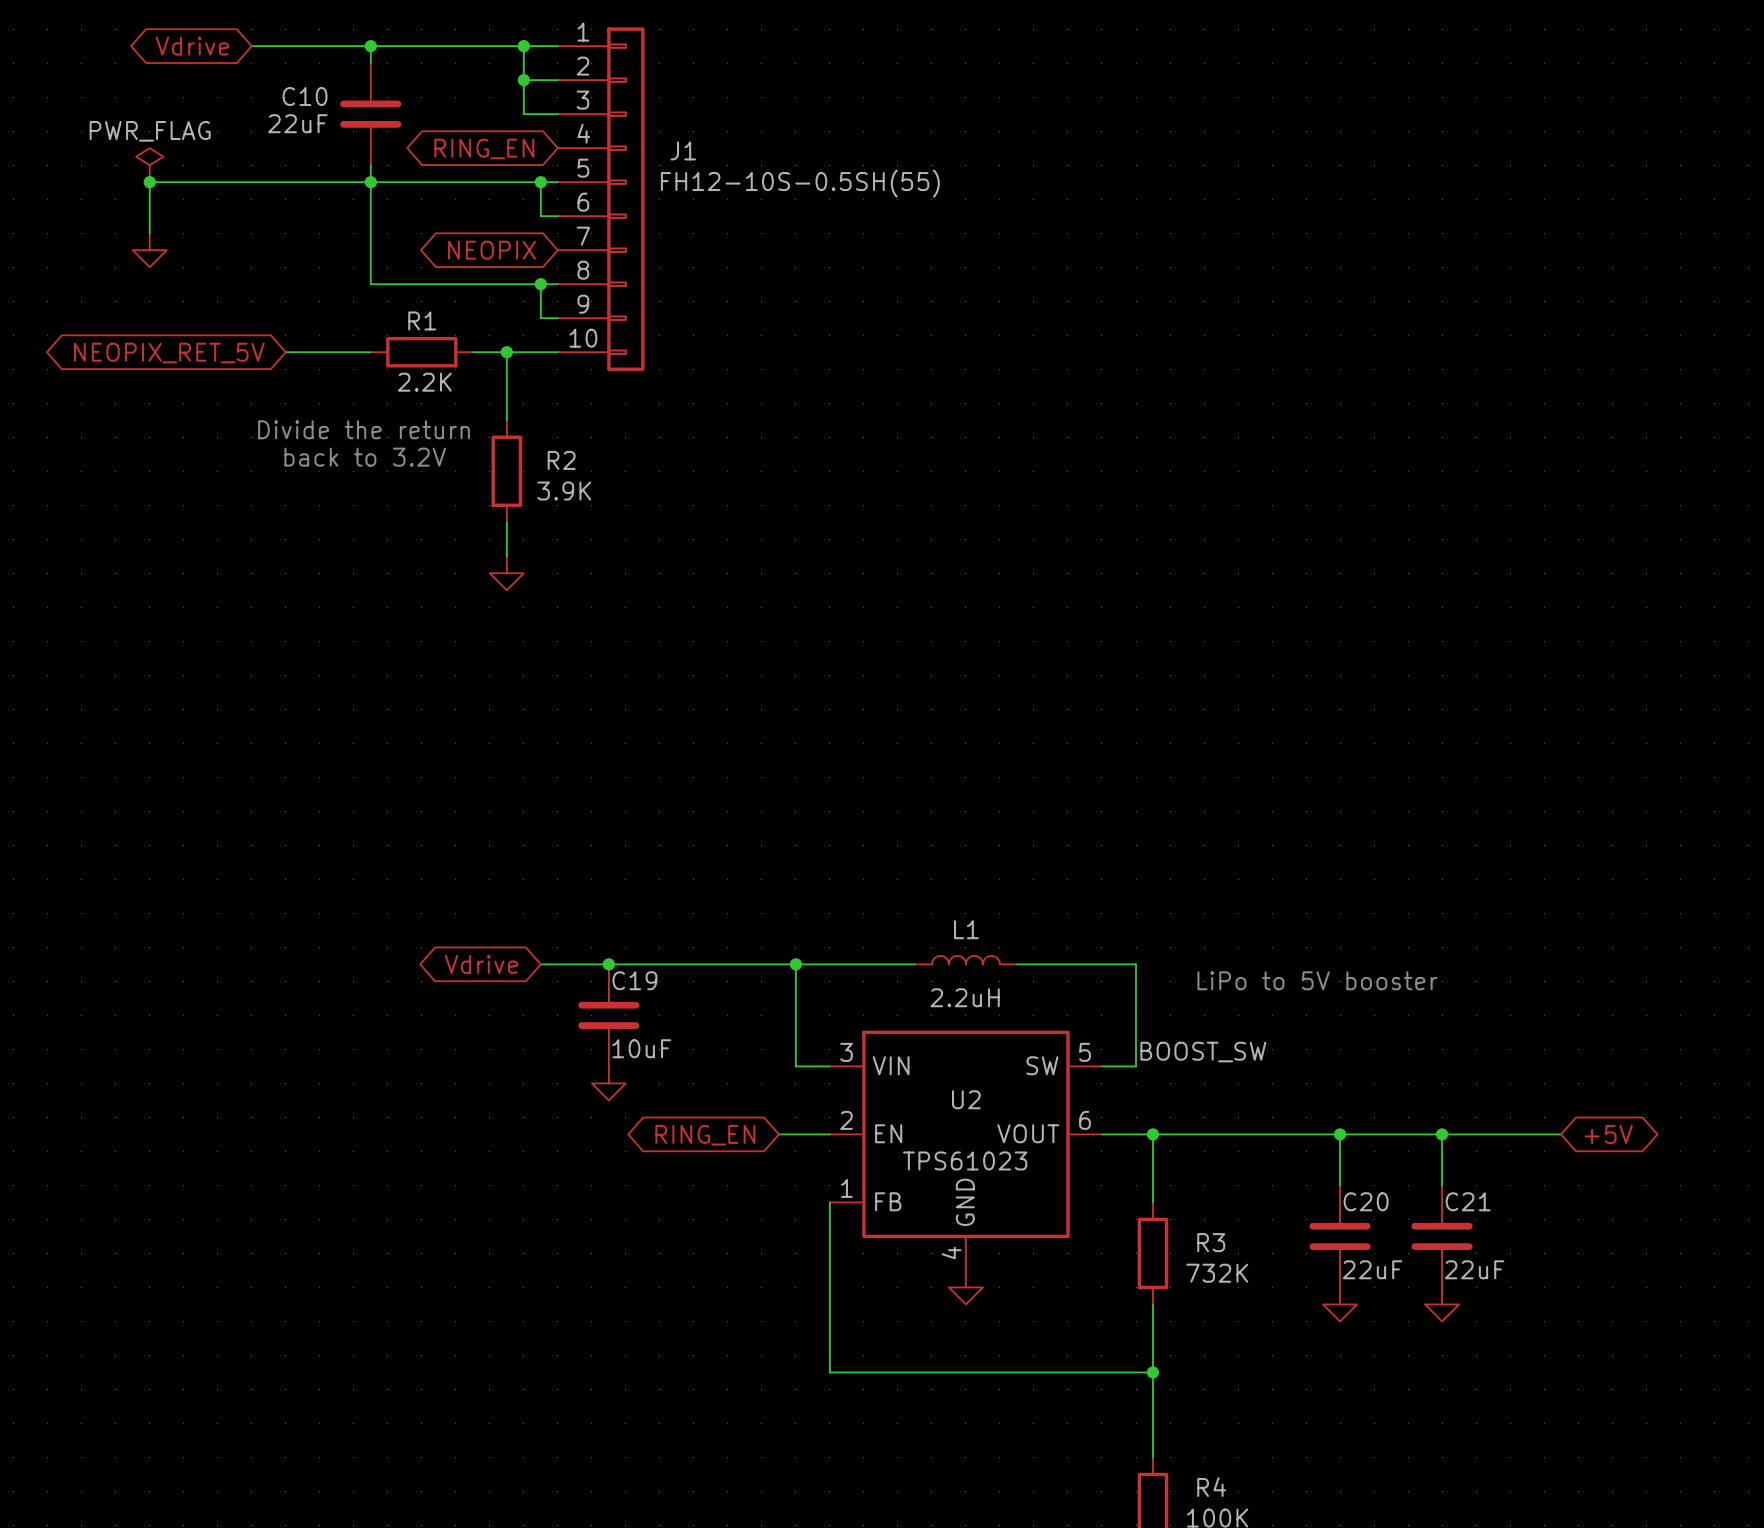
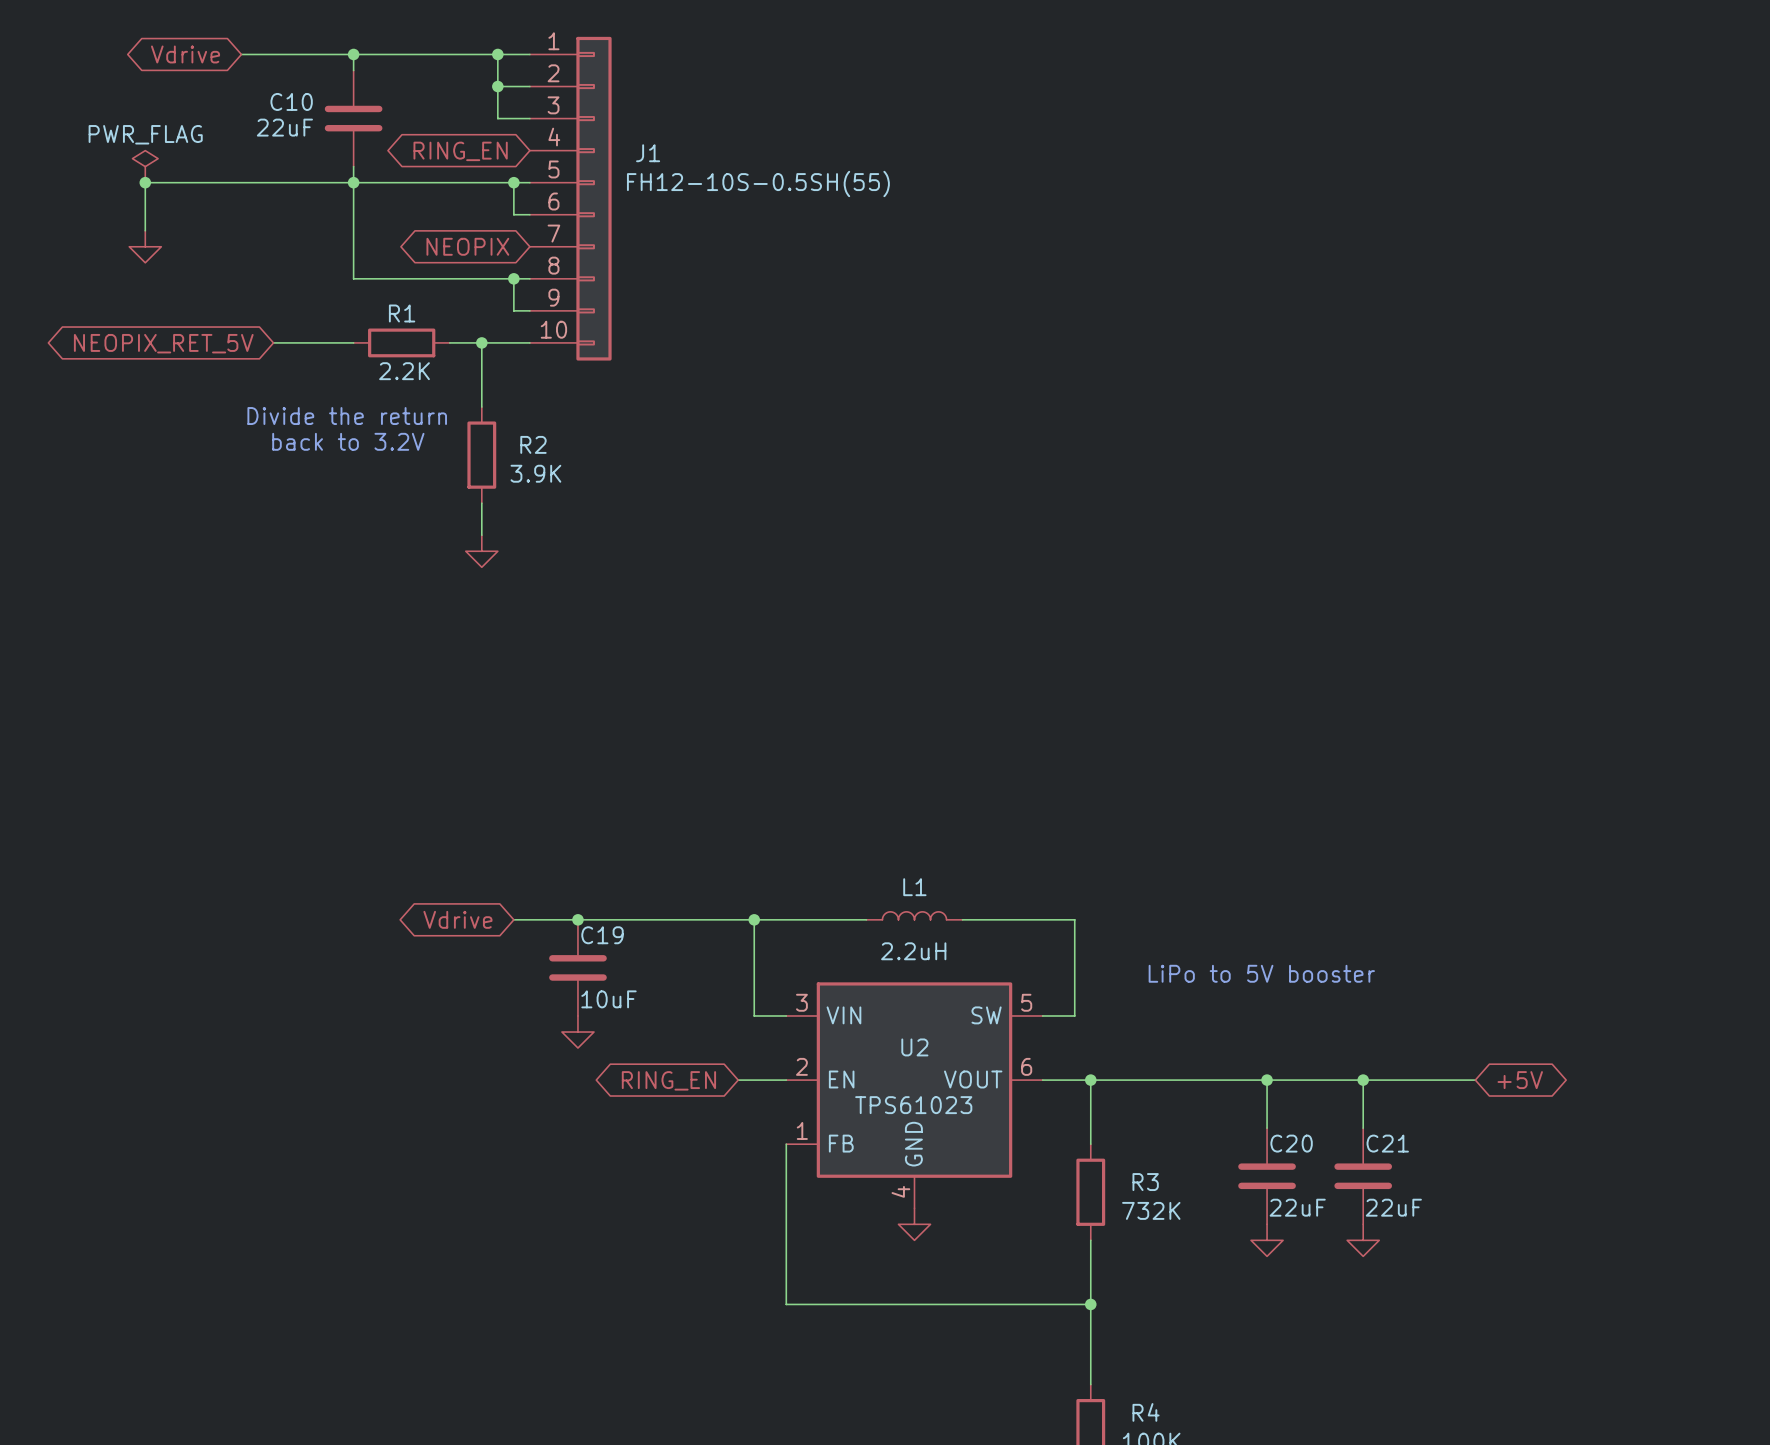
text position: LiPo to 5V booster (1317, 980) -> LiPo to 5V booster (1261, 973)
label: BOOST_SW (1203, 1052) -> none

